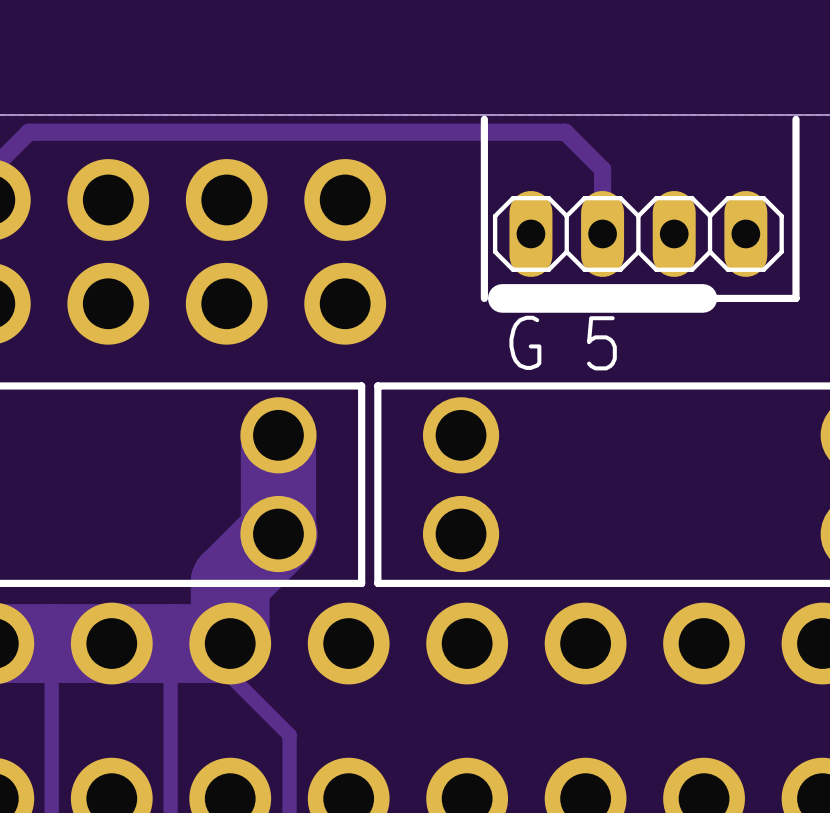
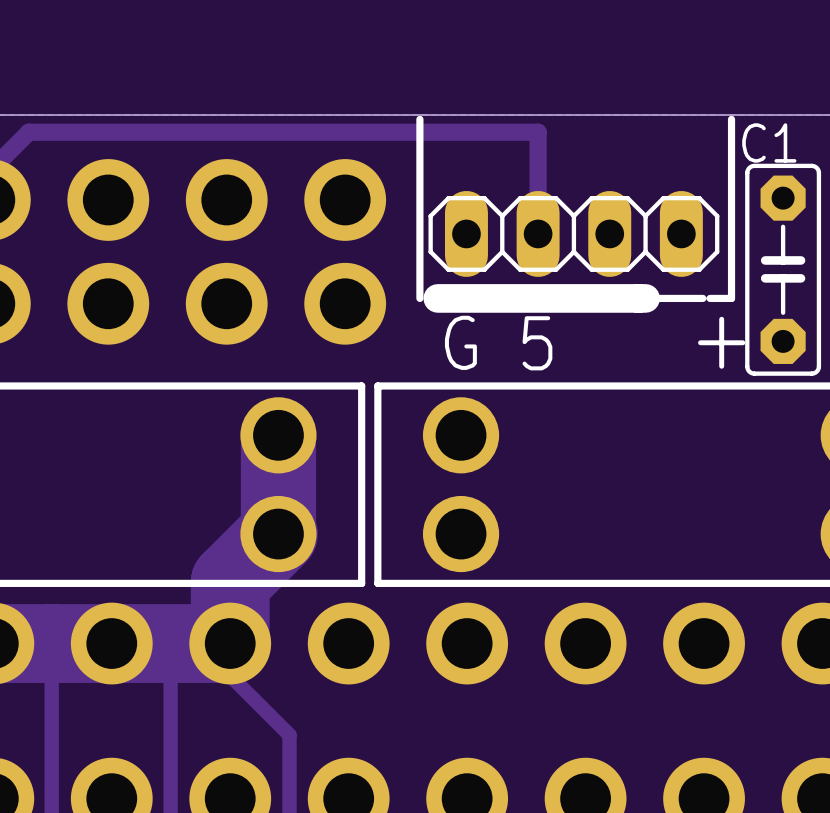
line: (484, 119) (484, 298) -> (419, 119) (419, 298)
line: (796, 119) (796, 298) (731, 298) -> (731, 119) (731, 298)
track: (538, 132) (565, 132) (602, 169) (602, 233) -> (538, 132) (538, 233)
part position: (638, 233) -> (573, 233)
C1: none -> (783, 269)
line: none -> (437, 298) (502, 298)
line width: thick (645, 298) (702, 298) -> thin (645, 298) (702, 298)
text position: G (525, 342) -> G (460, 342)
text: none -> + (721, 342)
text position: 5 (601, 343) -> 5 (537, 343)

